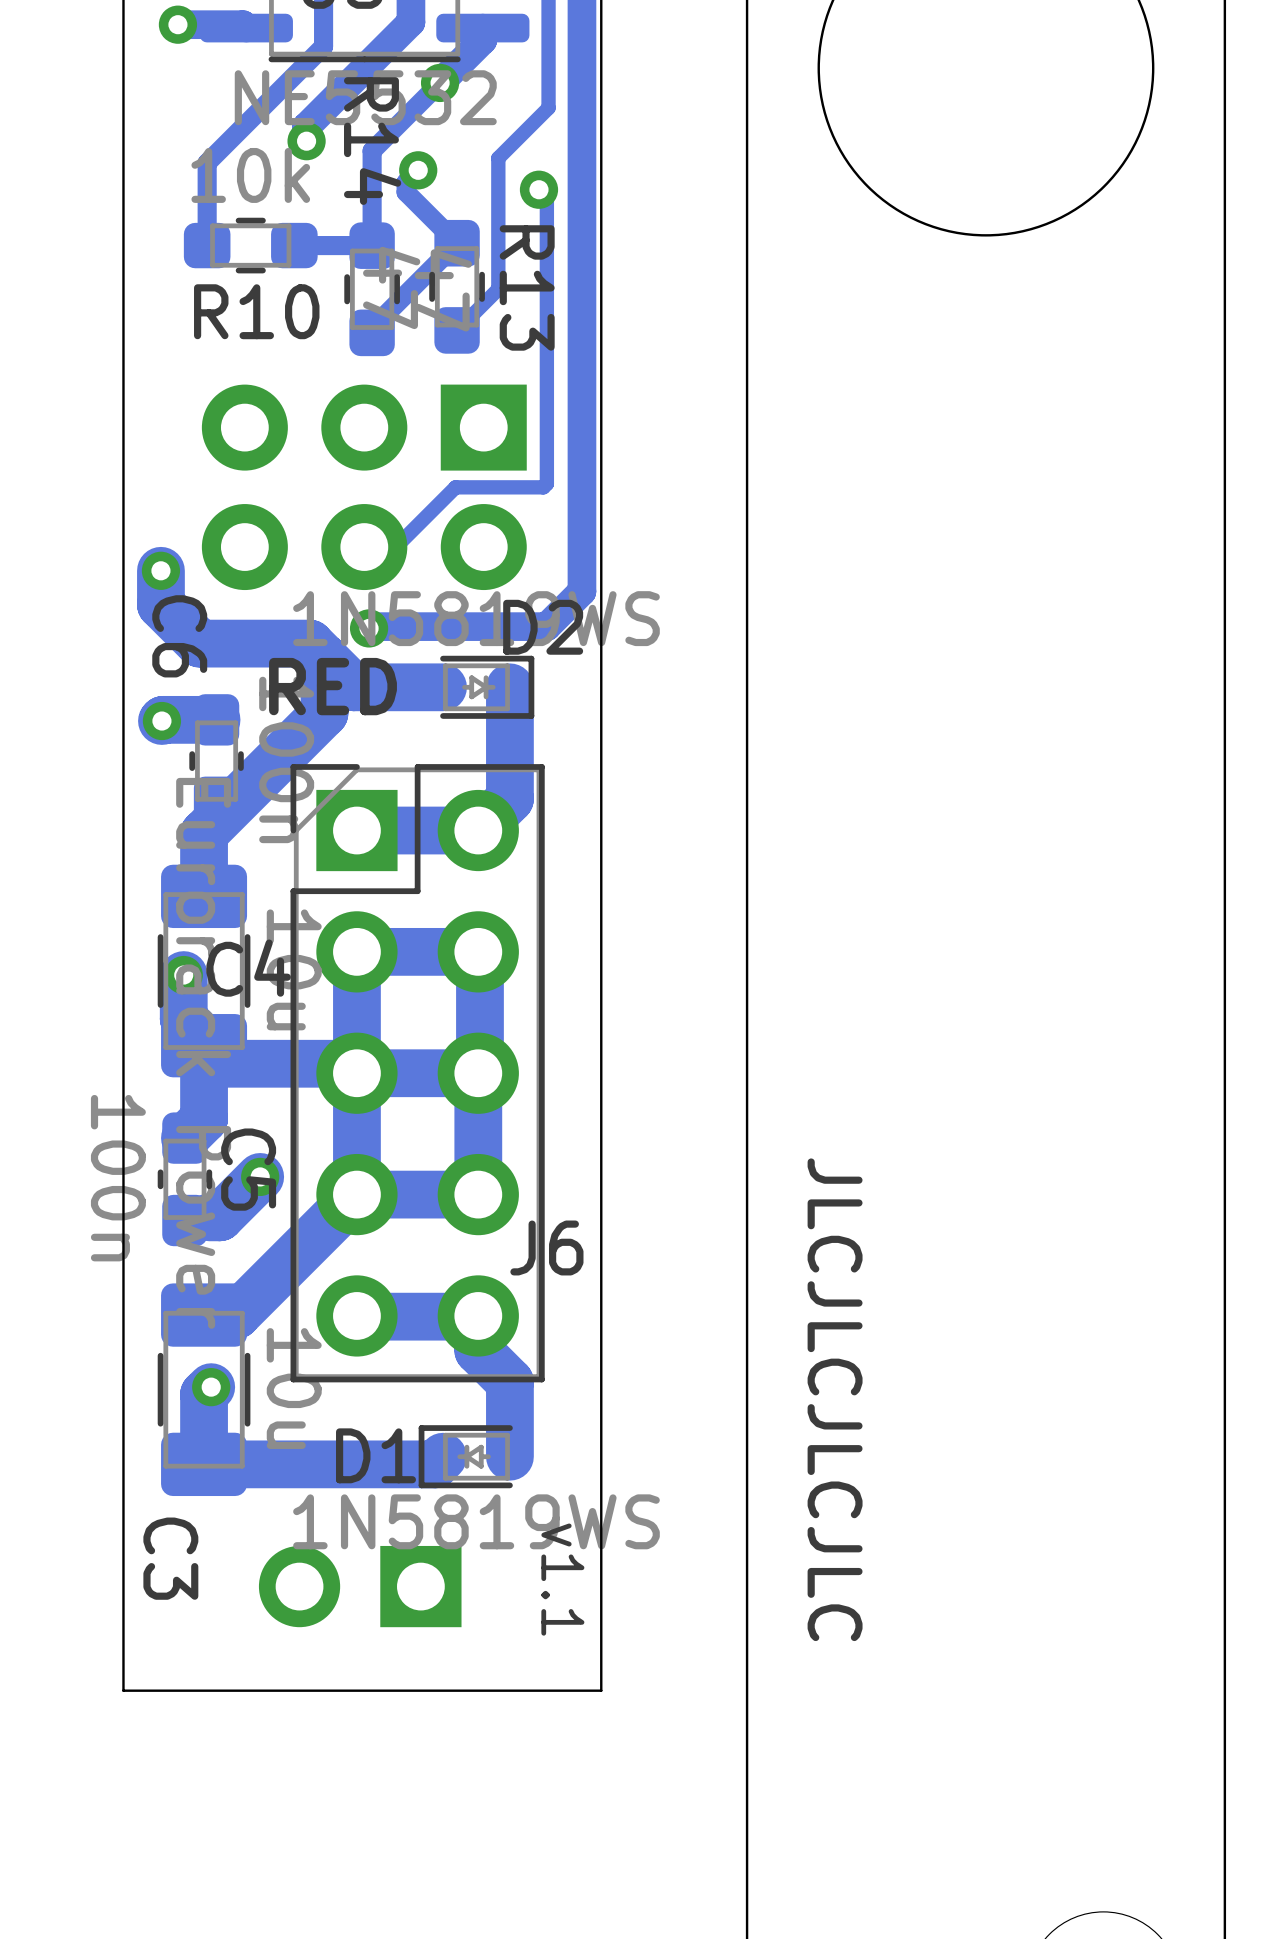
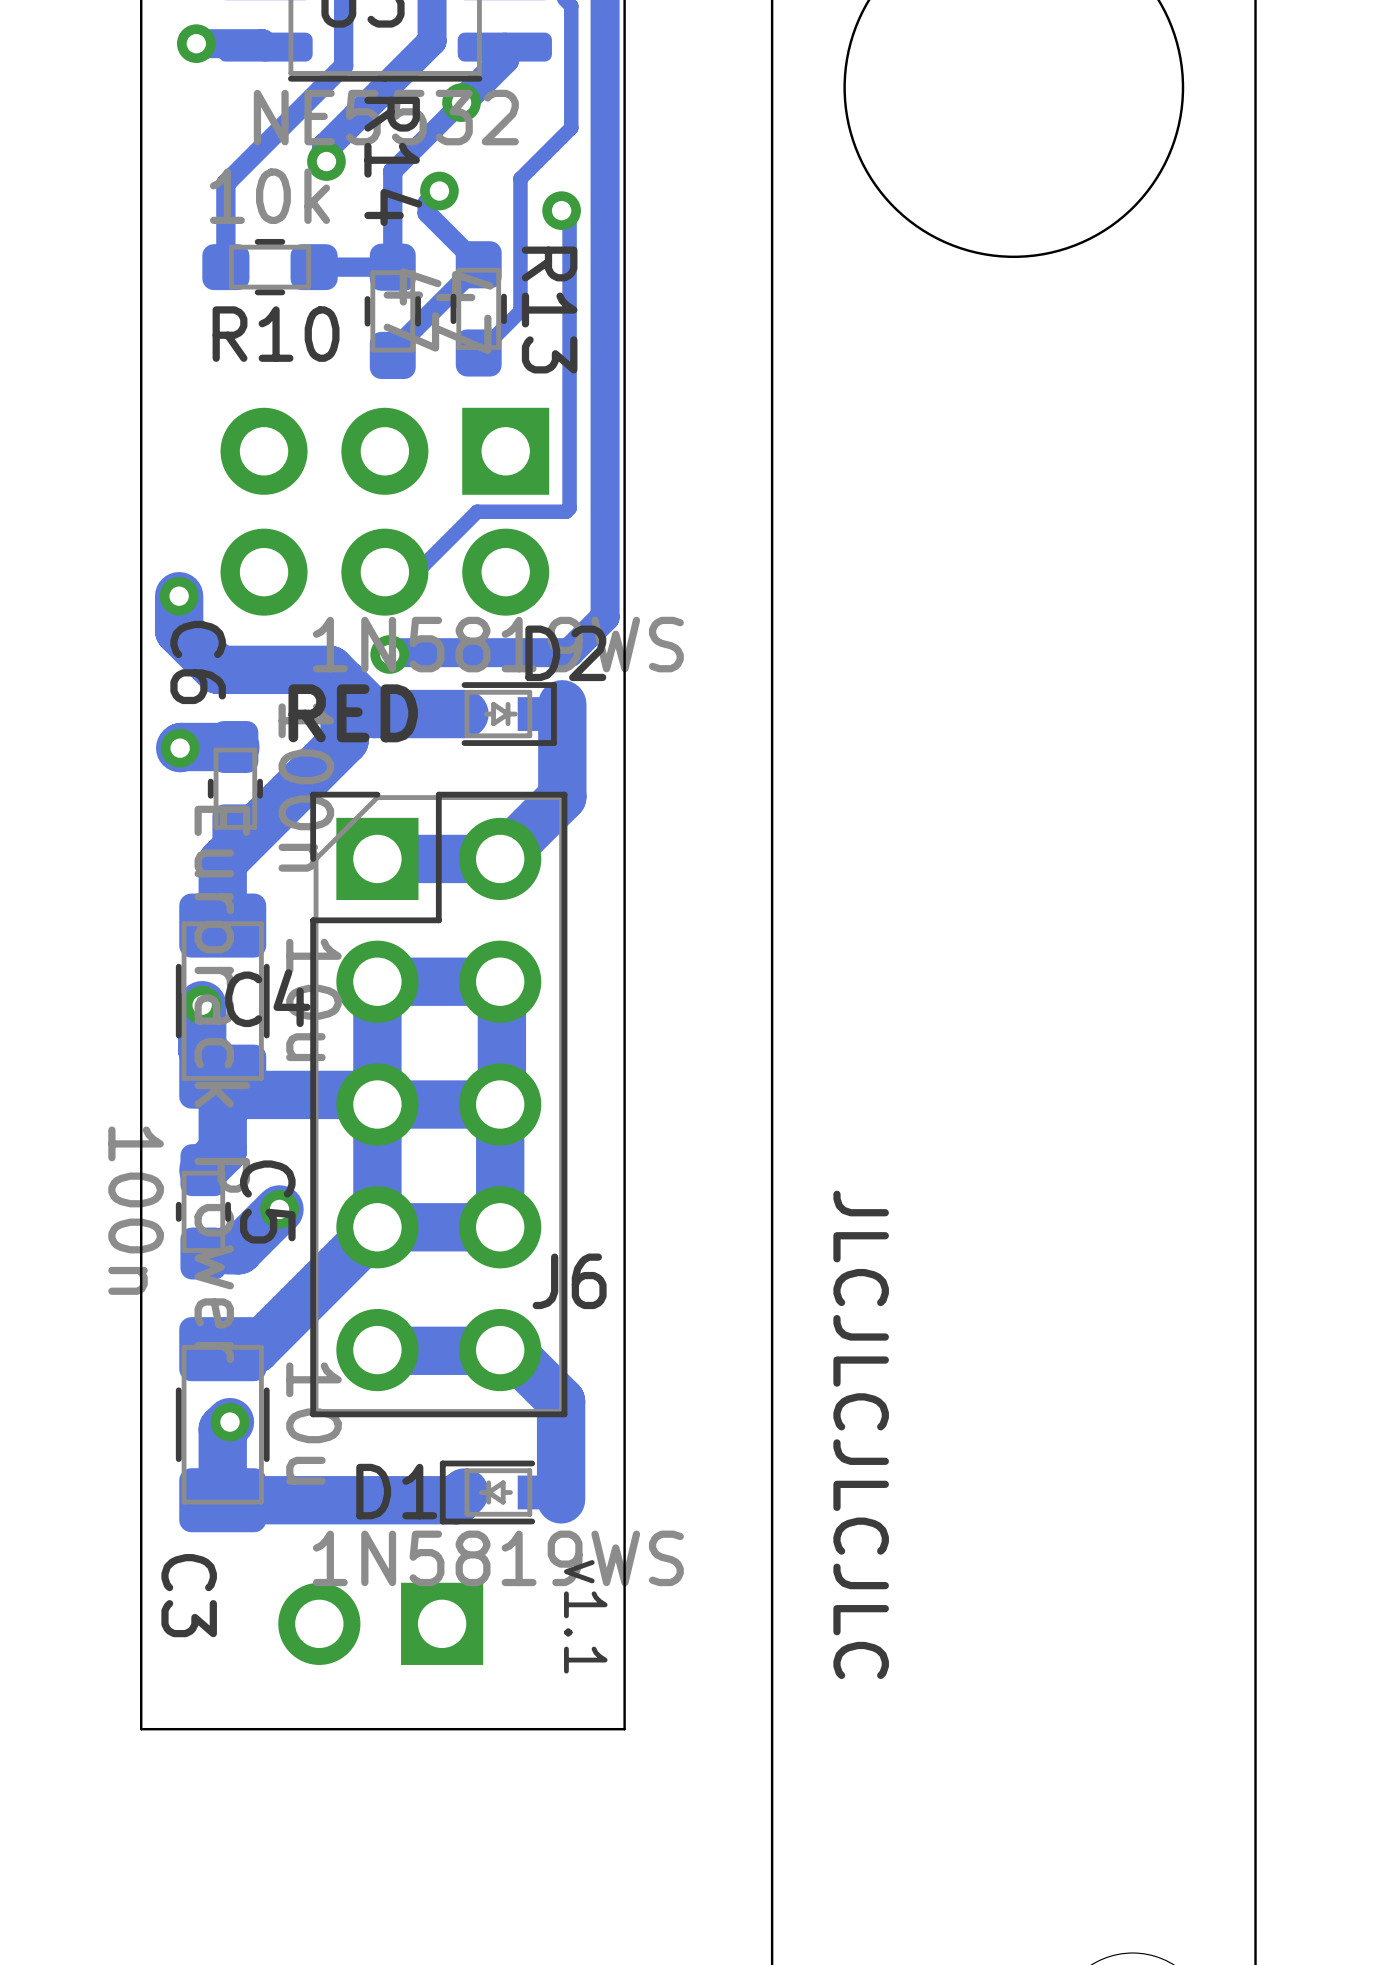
track: (509, 687) (509, 798) -> (562, 704) (562, 796) (532, 826)
track: (478, 1315) (478, 1350) (509, 1382) (509, 1456) -> (500, 1350) (509, 1350) (561, 1401) (561, 1499)

